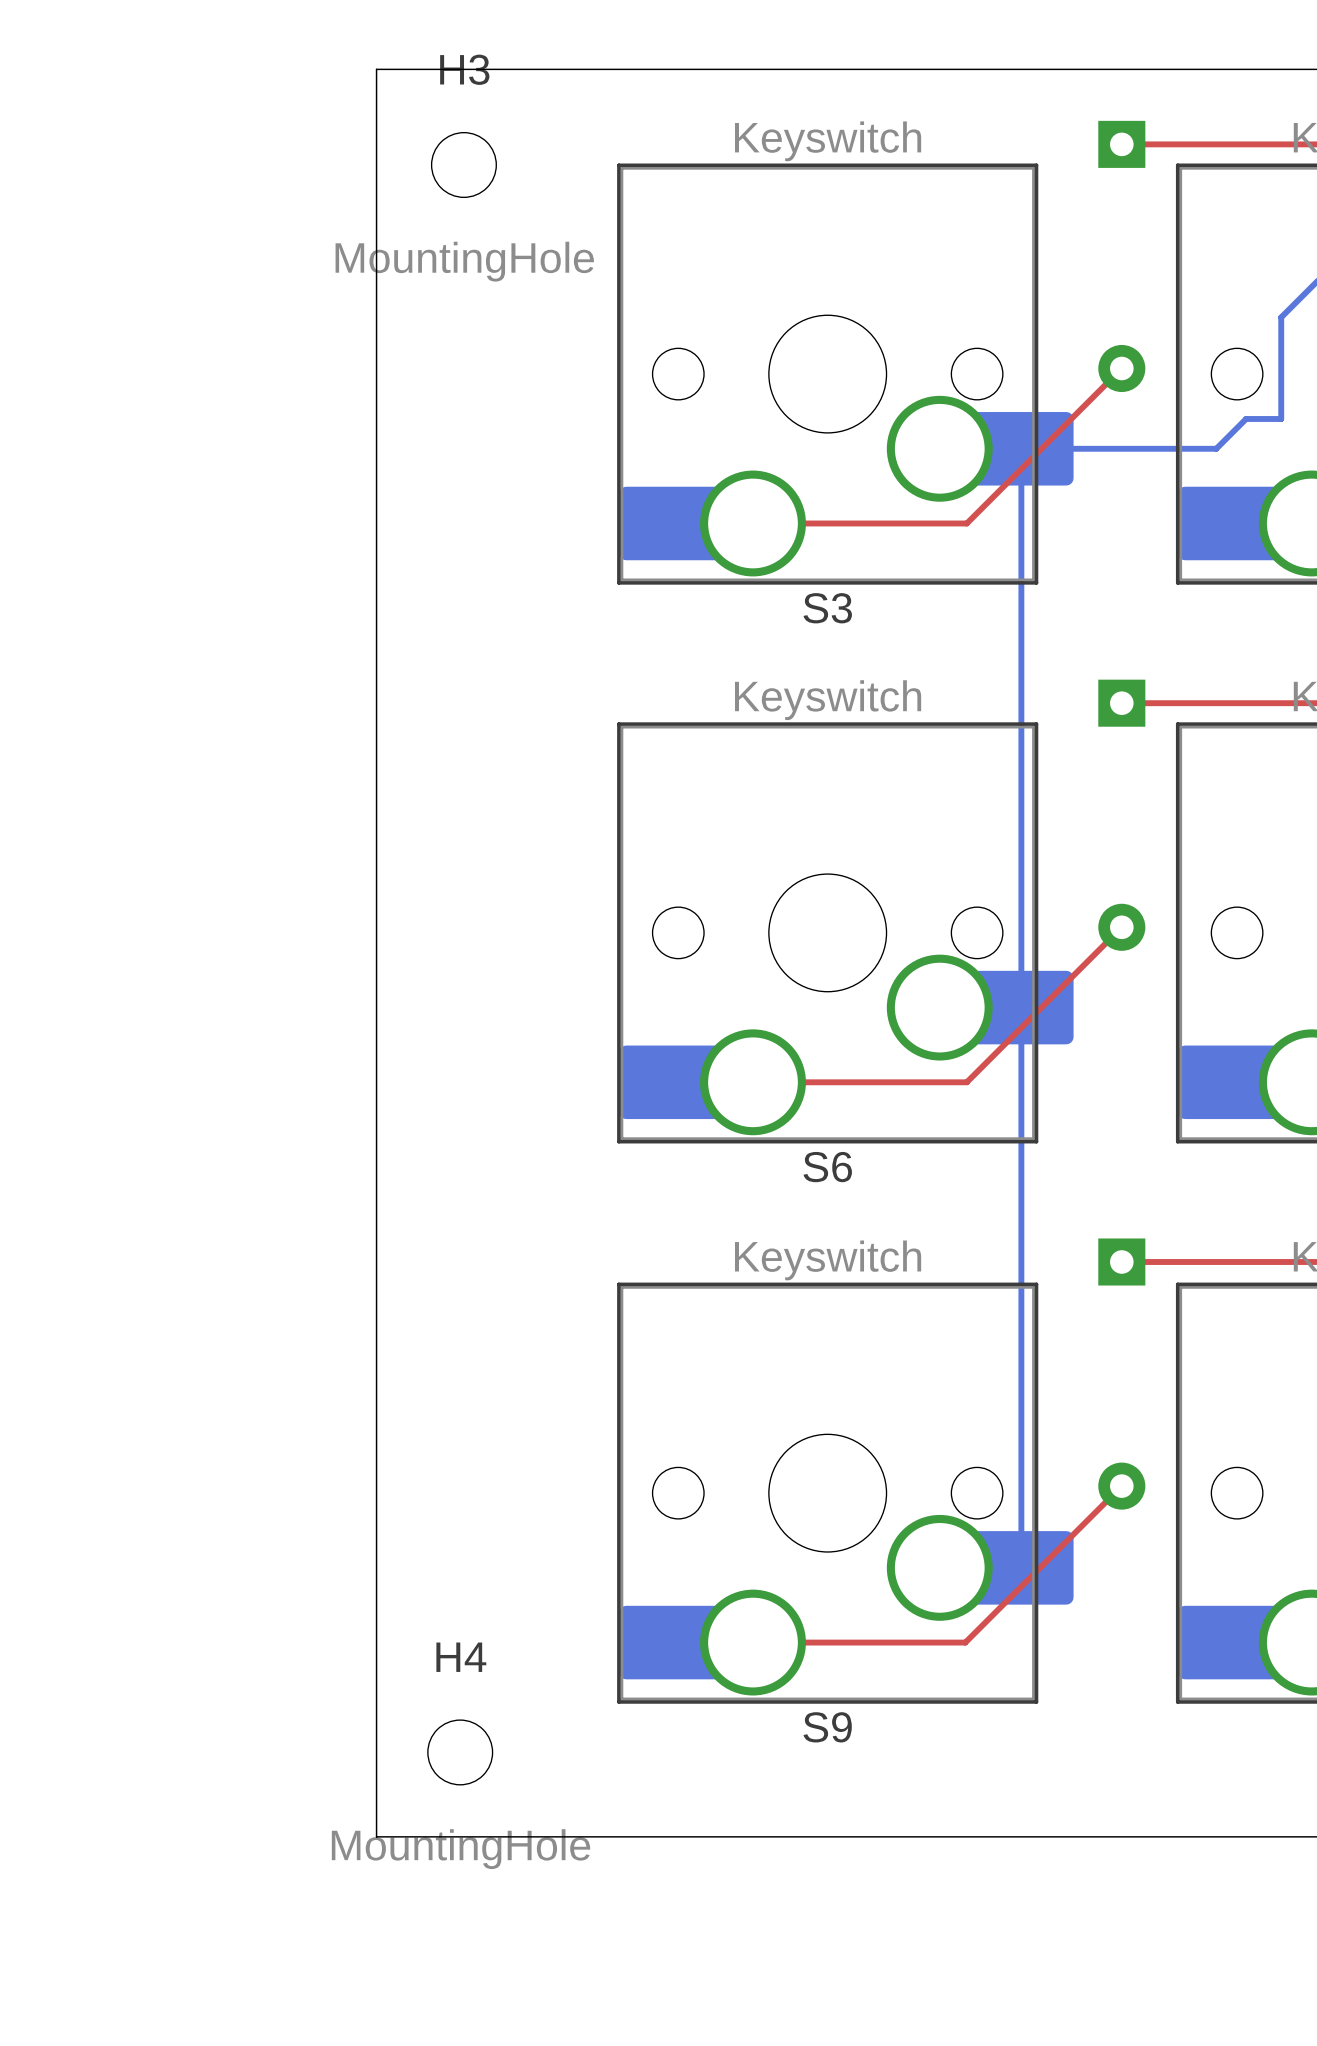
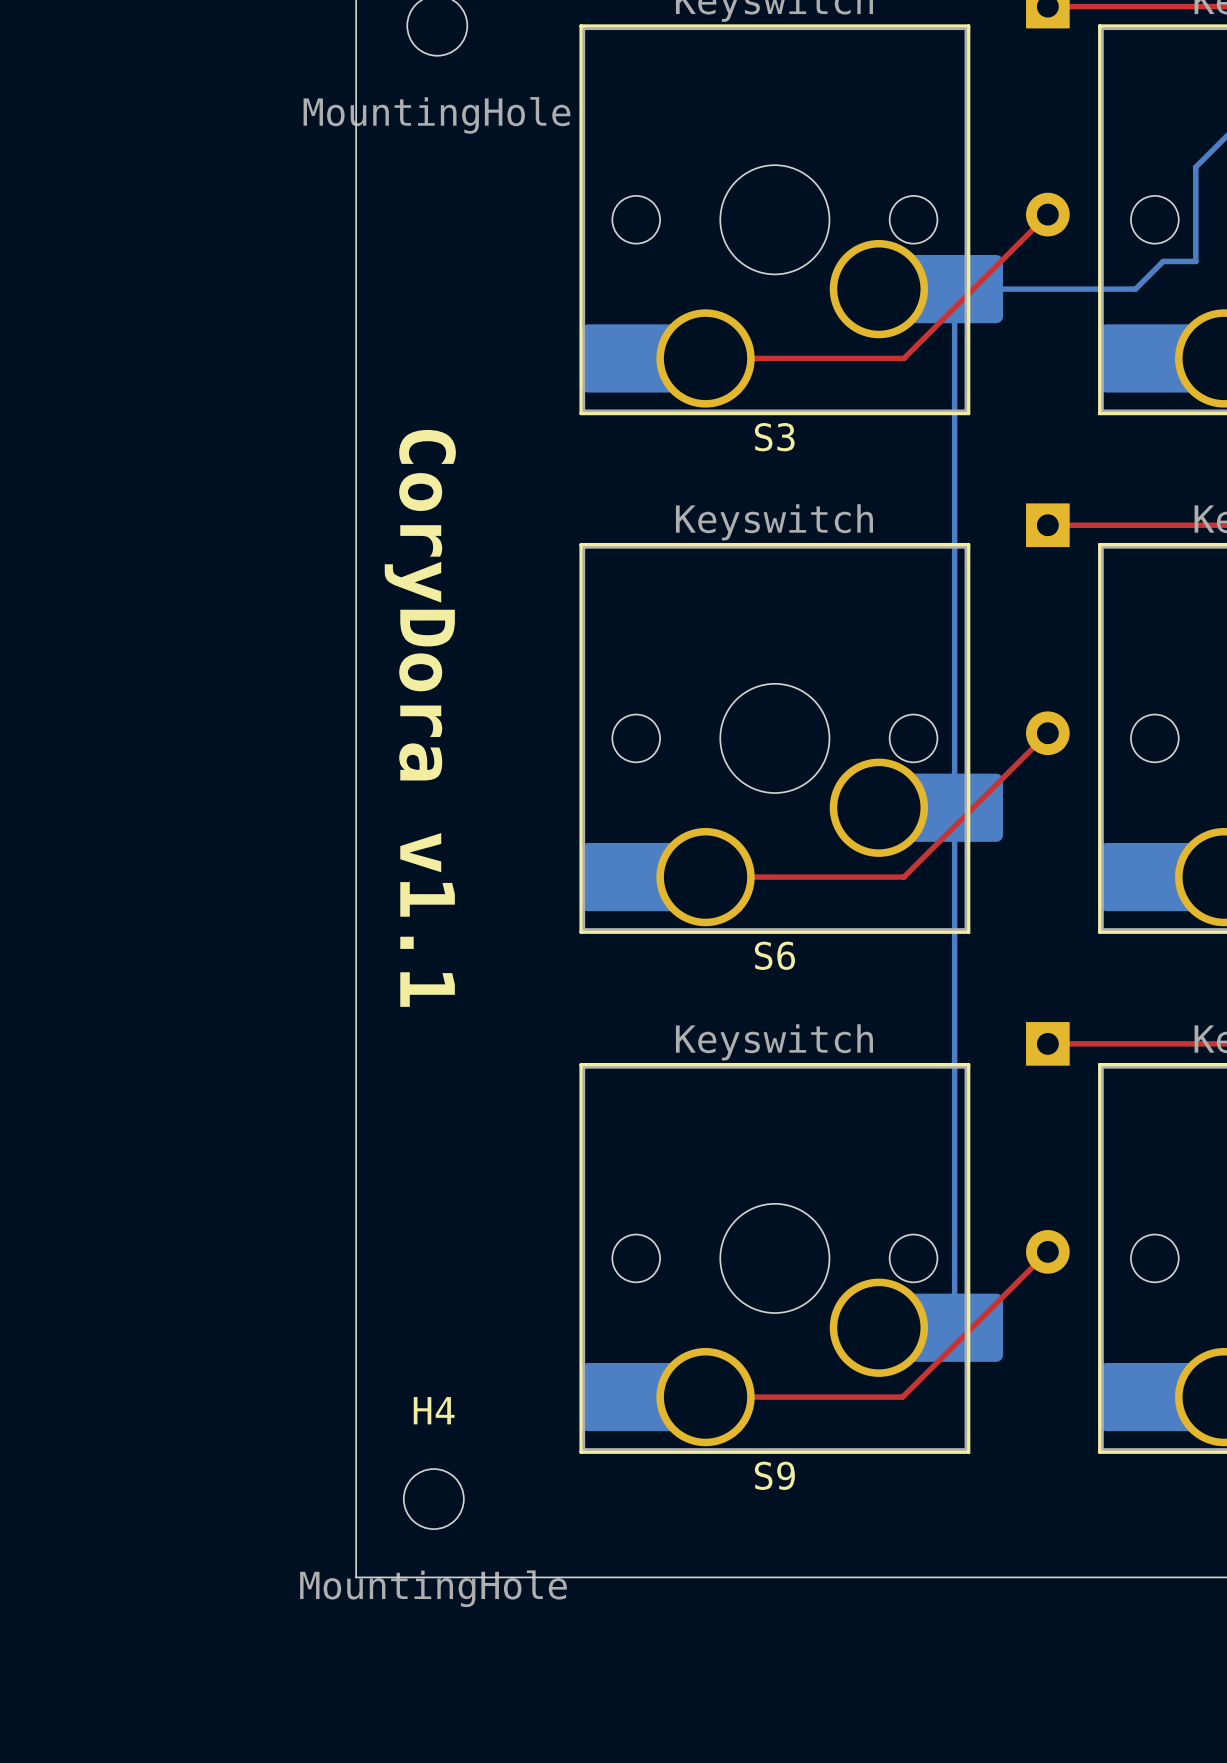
text: none -> CoryDora v1.1 (420, 718)

